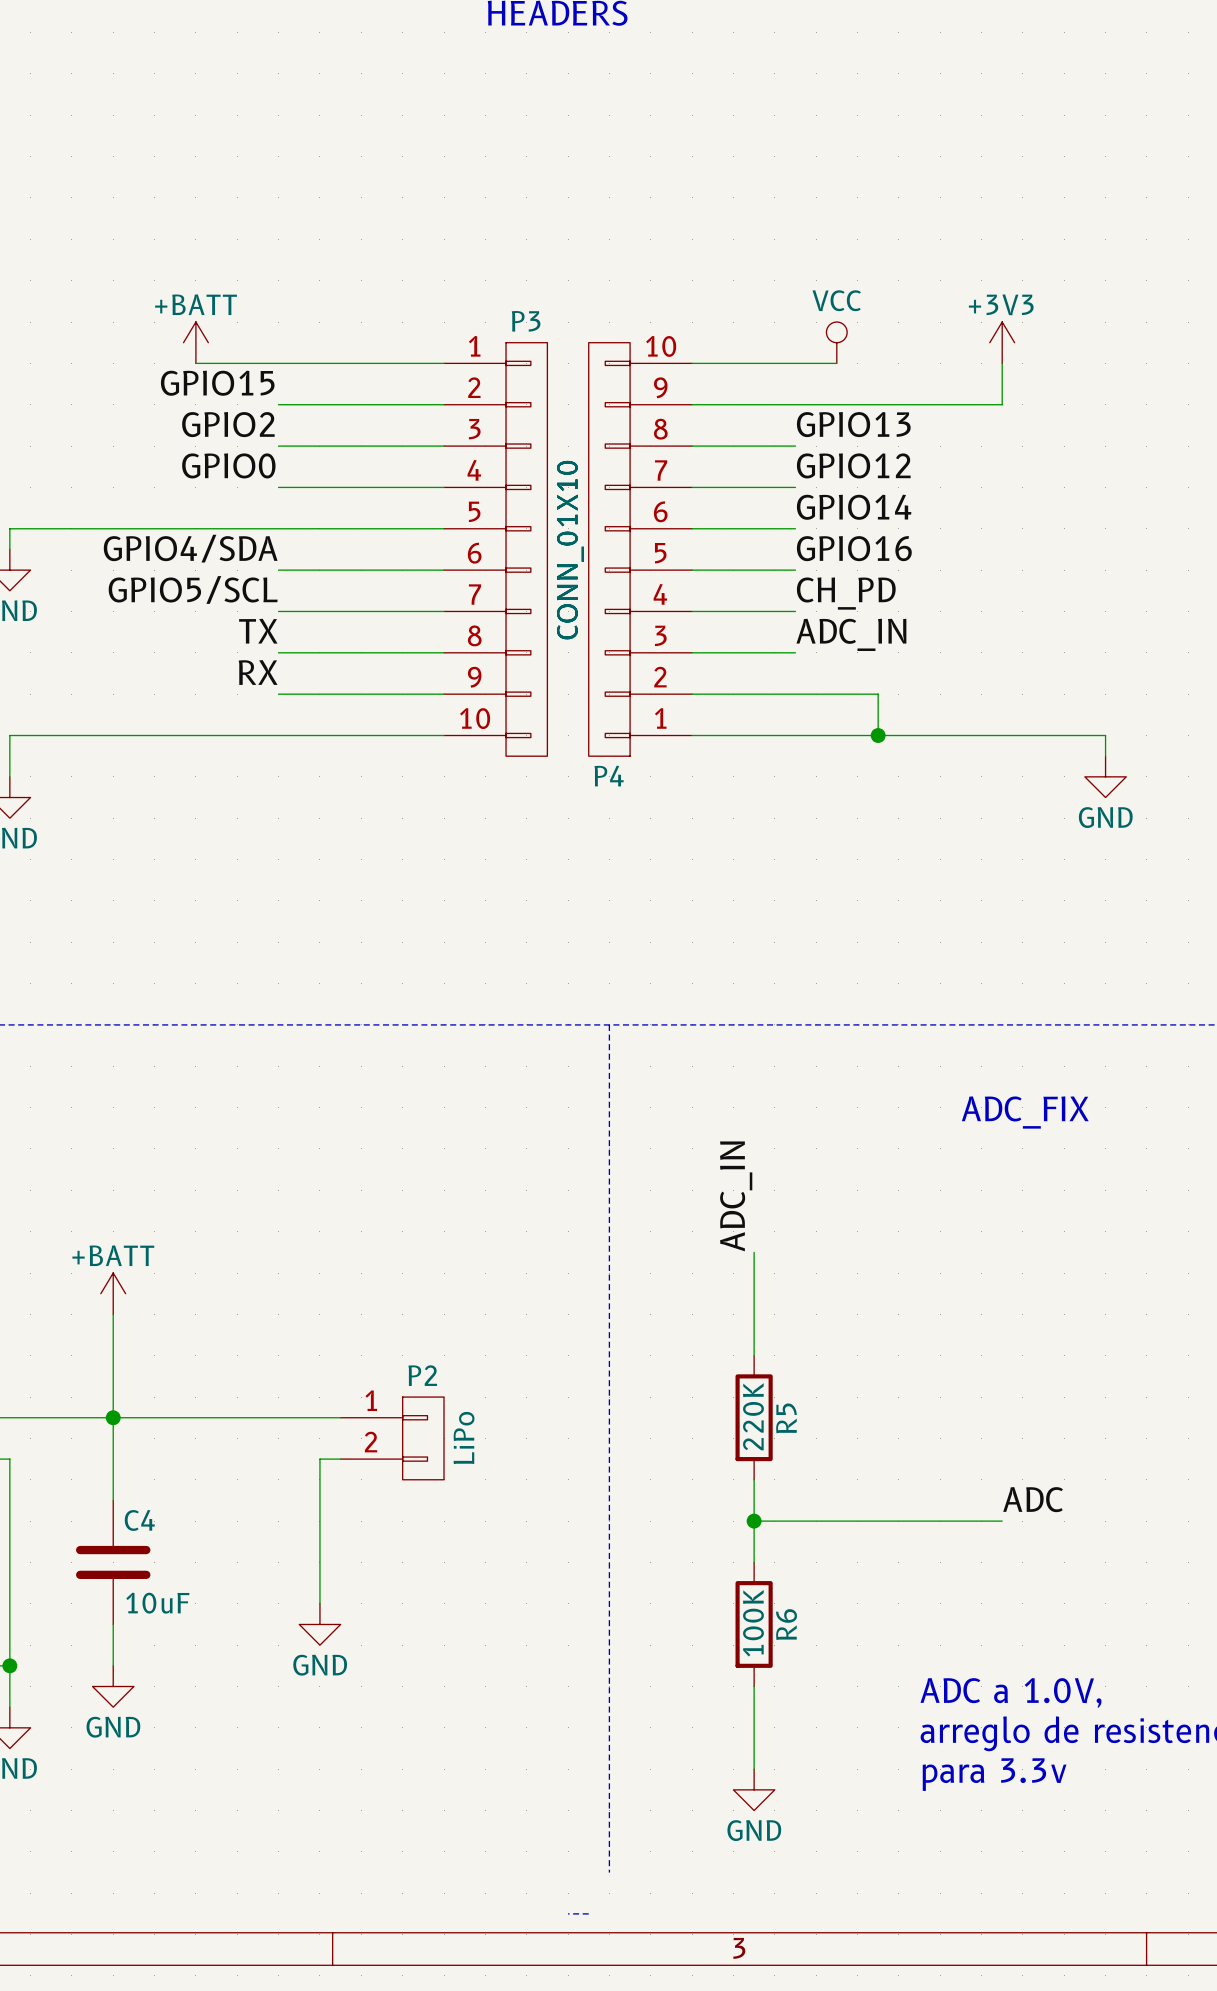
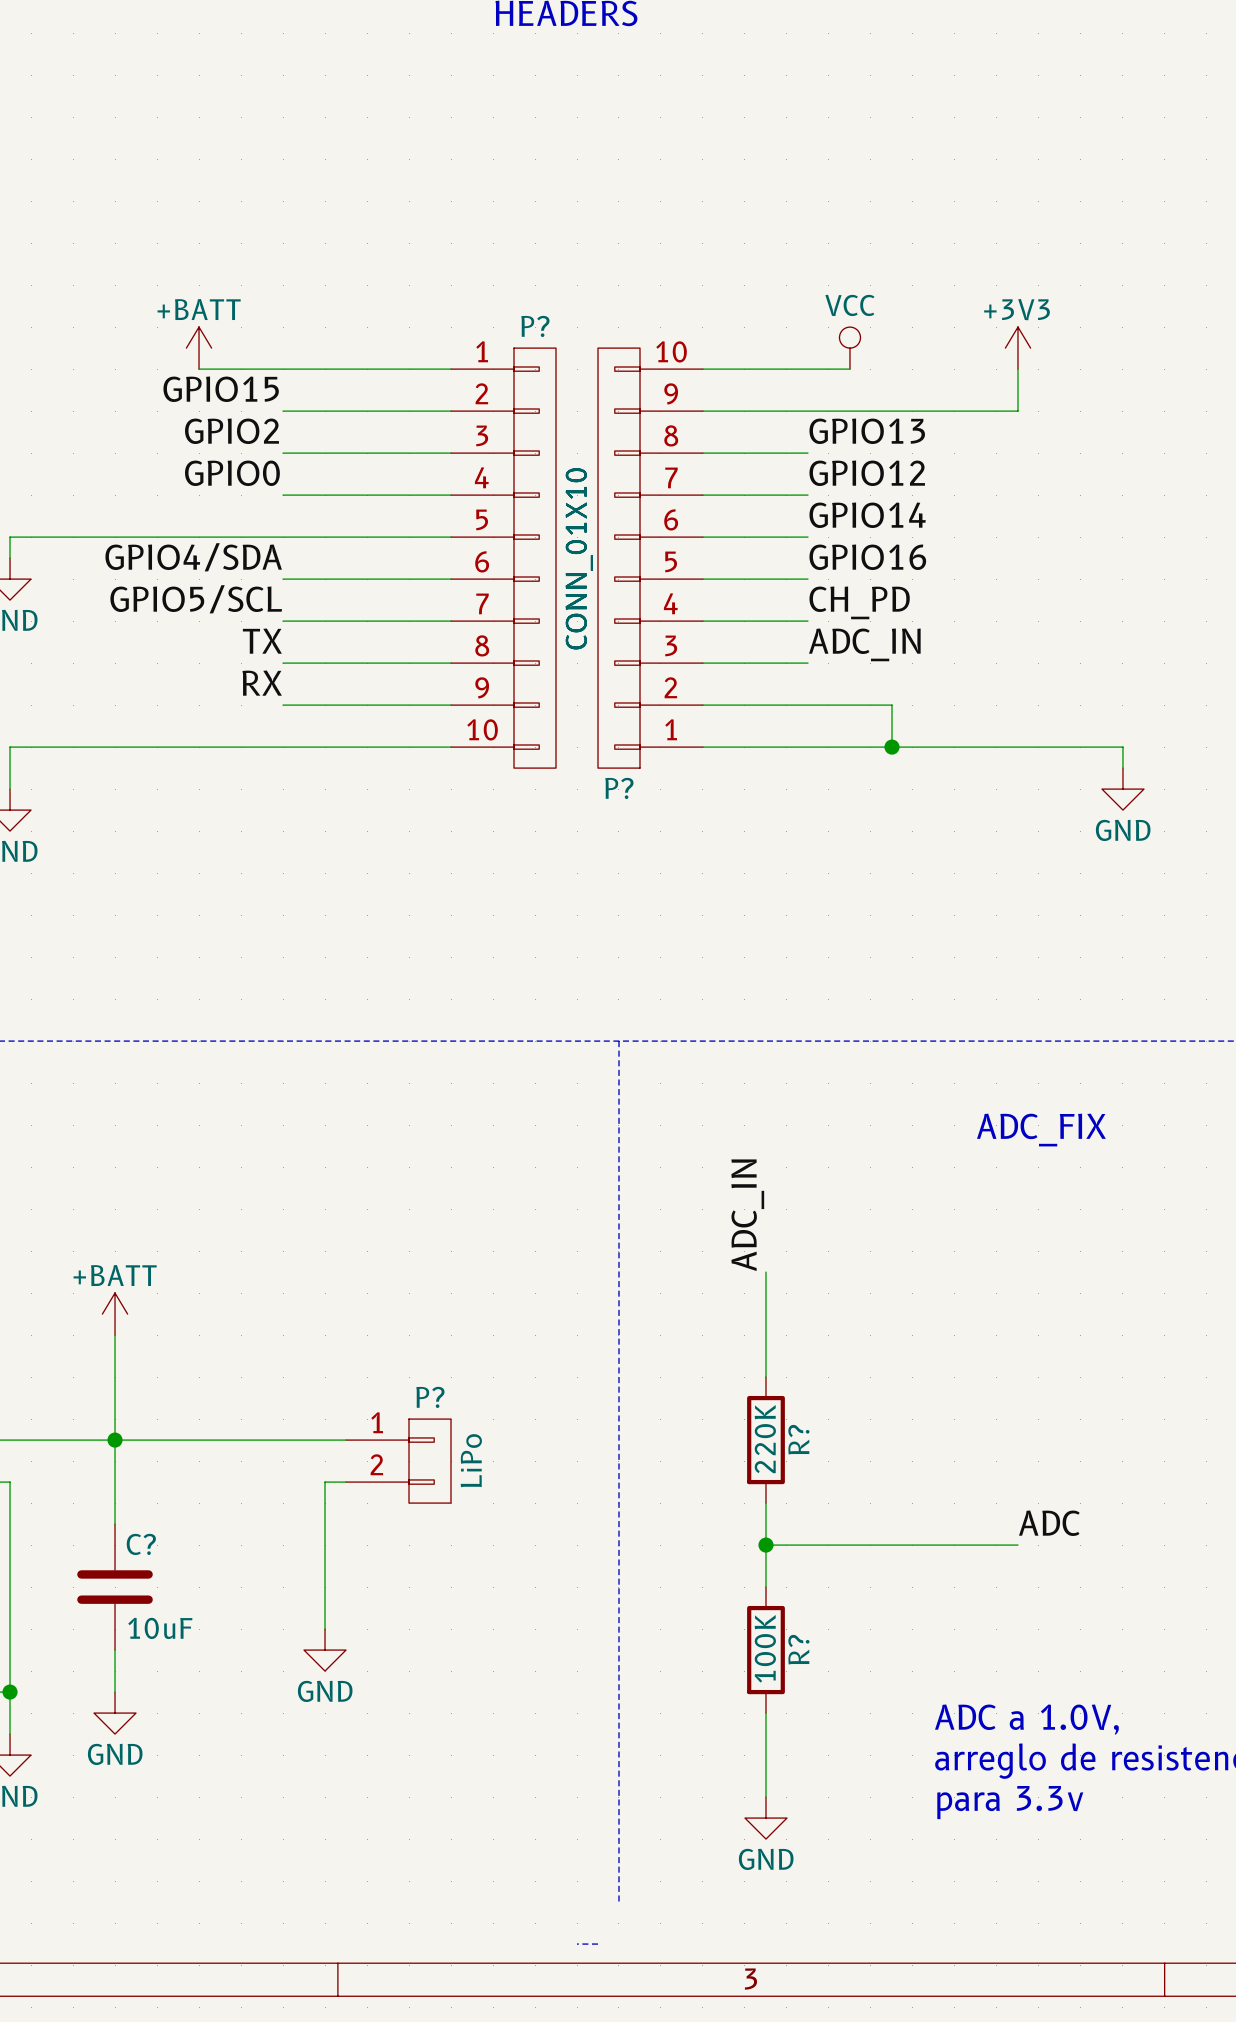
P3 name: P3 (526, 321) -> P? (535, 326)
P4 name: P4 (609, 776) -> P? (619, 788)
P2 name: P2 (422, 1375) -> P? (430, 1397)
R5 name: R5 (786, 1418) -> R? (798, 1439)
C4 name: C4 (139, 1520) -> C? (141, 1544)
R6 name: R6 (786, 1624) -> R? (798, 1649)

